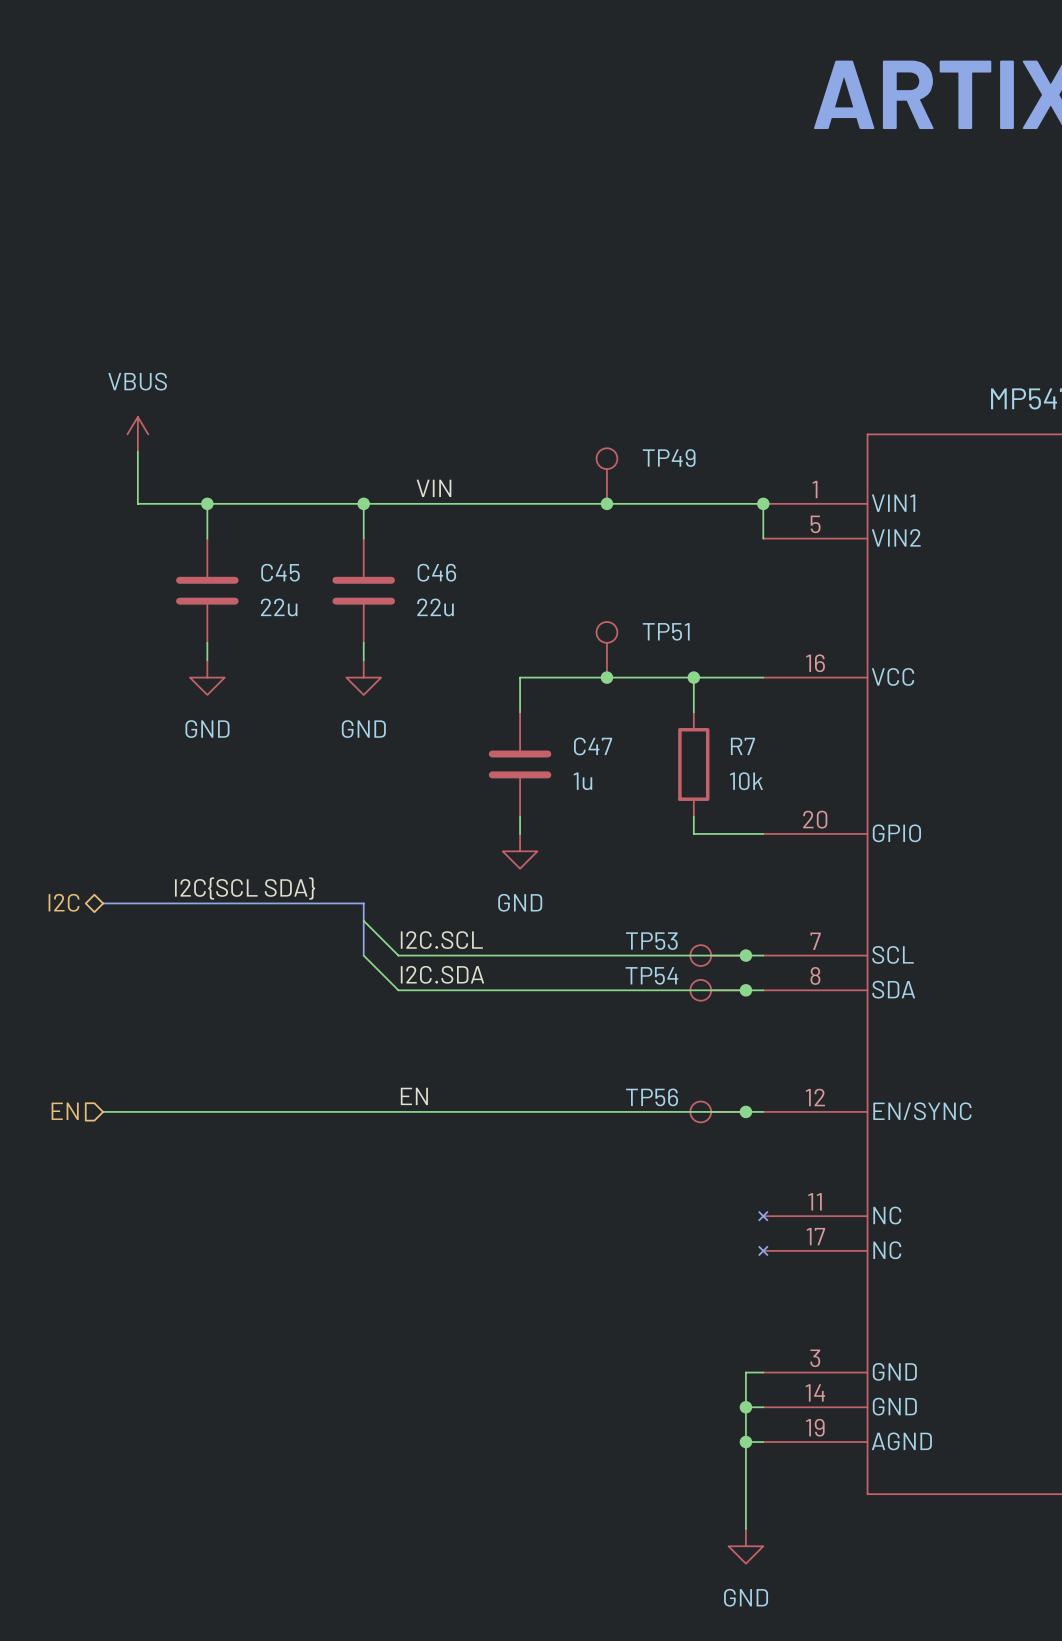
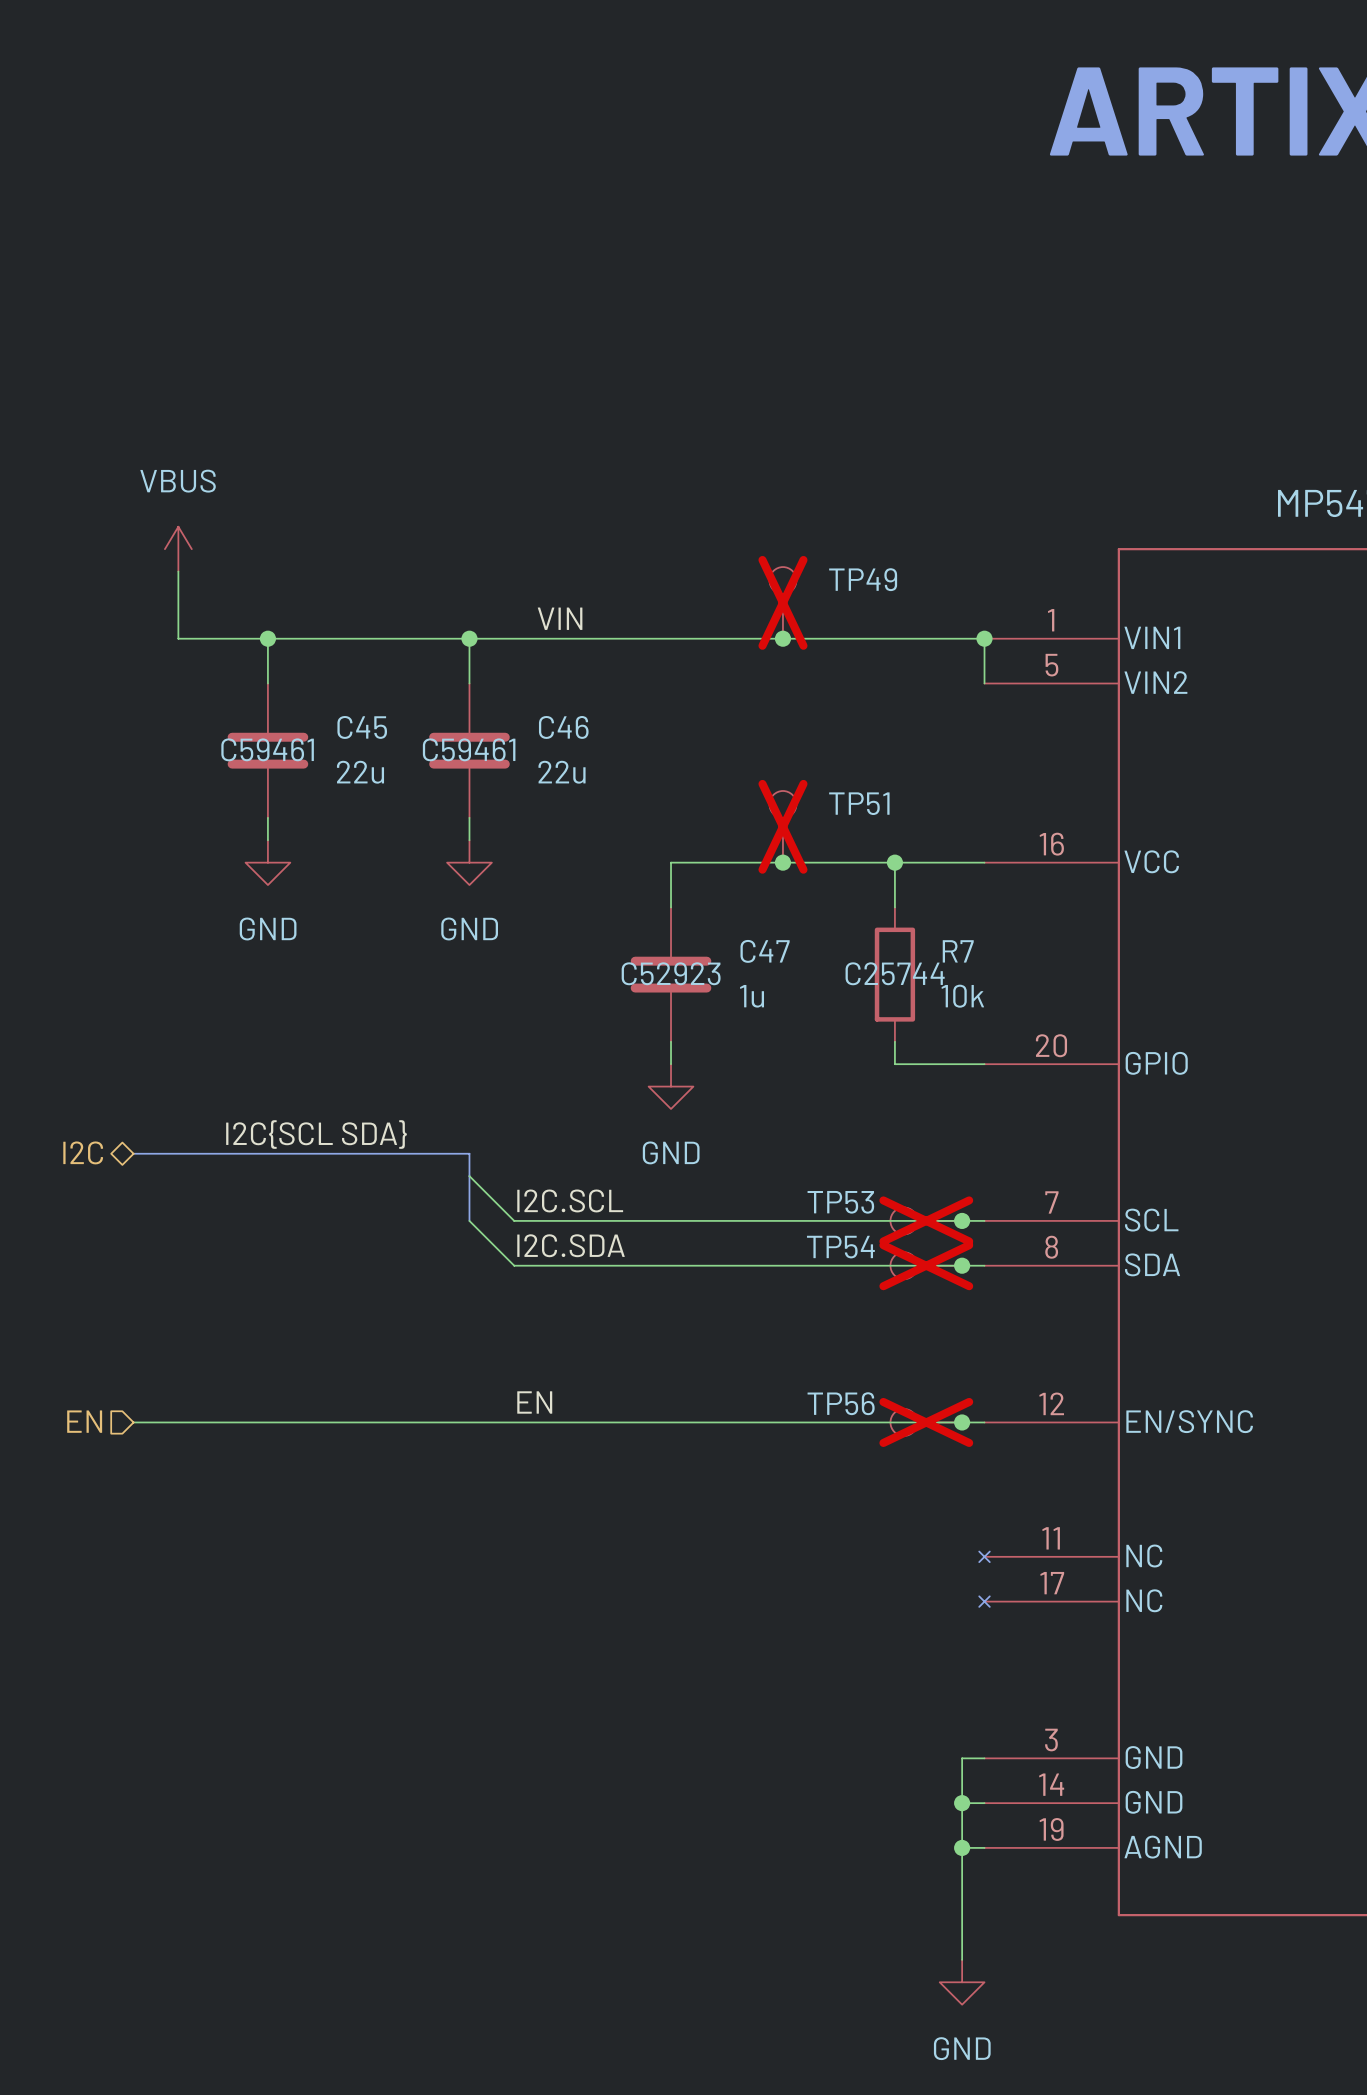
TP49 do-not-place cross: none -> (782, 602)
C45 text: none -> C59461 (267, 749)
C46 text: none -> C59461 (469, 749)
TP51 do-not-place cross: none -> (782, 826)
C47 text: none -> C52923 (671, 973)
R7 text: none -> C25744 (895, 973)
TP53 do-not-place cross: none -> (926, 1220)
TP54 do-not-place cross: none -> (926, 1265)
TP56 do-not-place cross: none -> (926, 1422)

